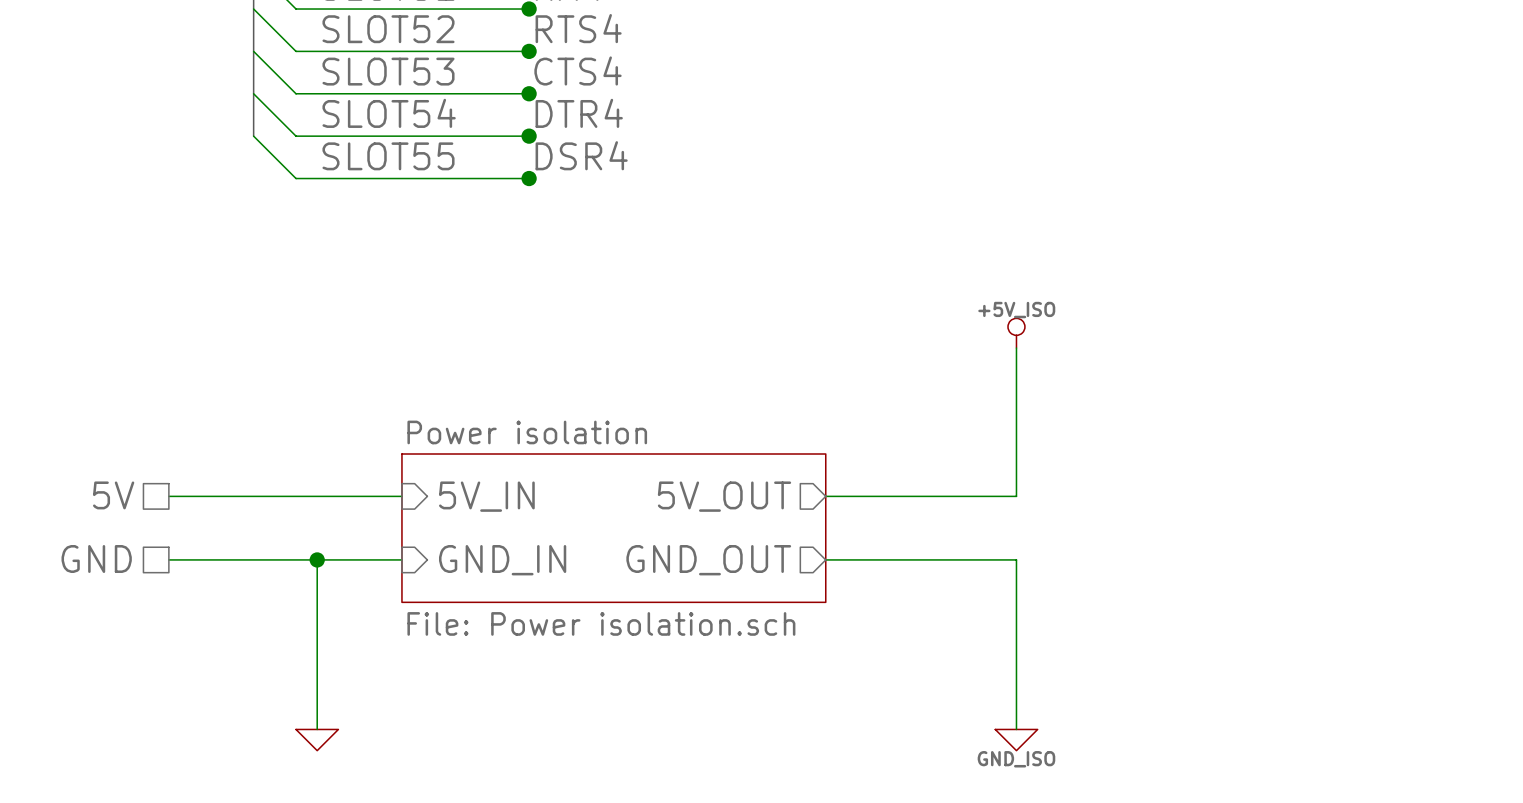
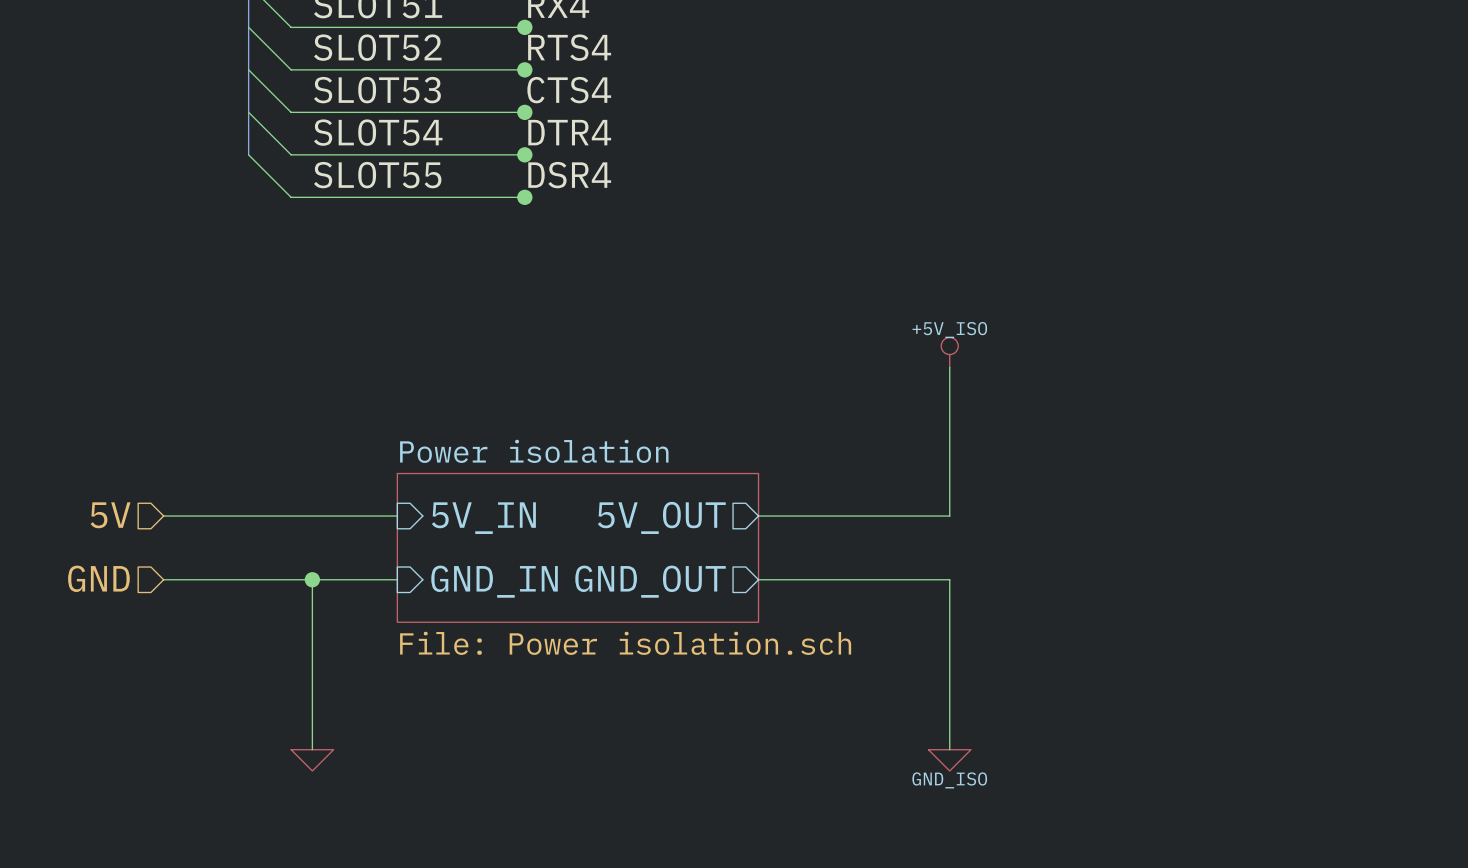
power symbol position: +5V_ISO (1016, 333) -> +5V_ISO (949, 352)
wire: (1016, 348) (1016, 496) (952, 496) -> (949, 367) (949, 516)
hierarchical label shape: passive (113, 495) -> input (110, 515)
sheet pin position: 5V_OUT (724, 496) -> 5V_OUT (661, 517)
wire: none -> (758, 516) (822, 516)
sheet Power isolation: none -> File: Power isolation.sch (577, 547)
sheet Power isolation: File: Power isolation.sch (613, 528) -> none
hierarchical label shape: passive (96, 559) -> input (98, 578)
wire: none -> (758, 579) (822, 579)
wire: (952, 559) (1016, 559) (1016, 729) -> (949, 579) (949, 749)
sheet pin position: GND_OUT (708, 560) -> GND_OUT (650, 581)
power symbol position: GND_ISO (1016, 740) -> GND_ISO (949, 760)

